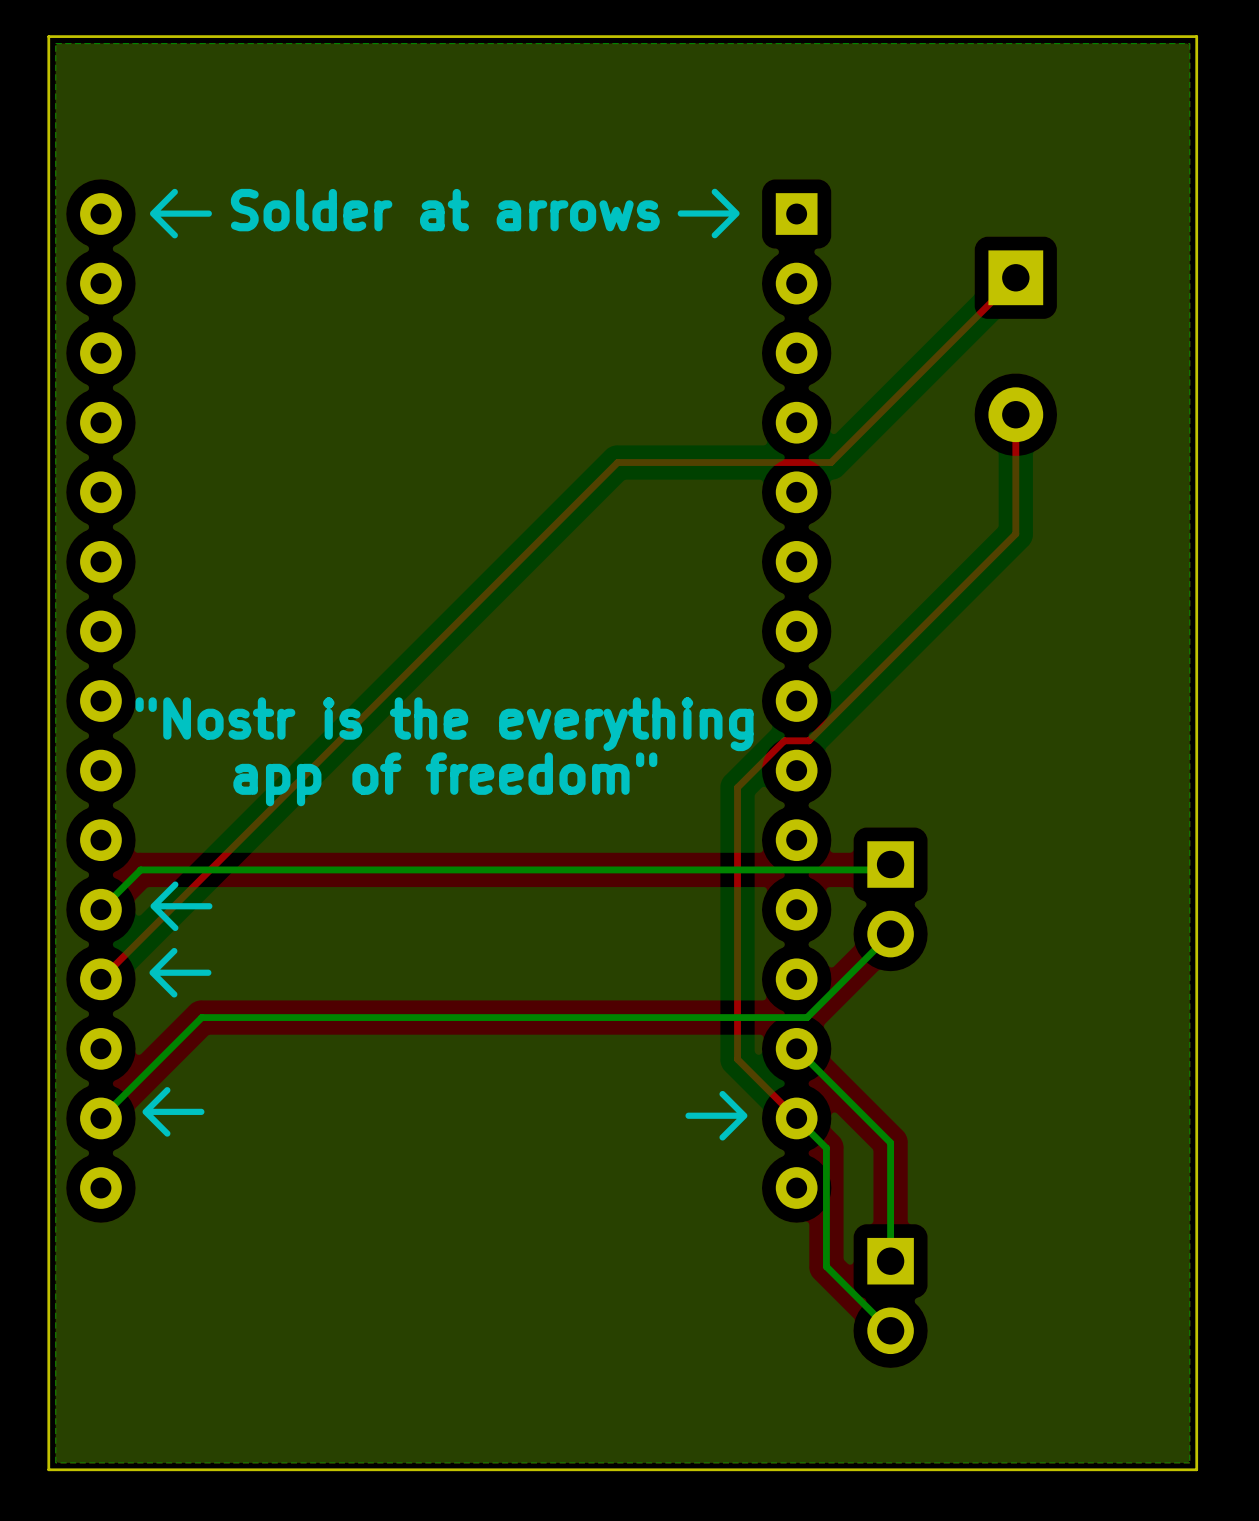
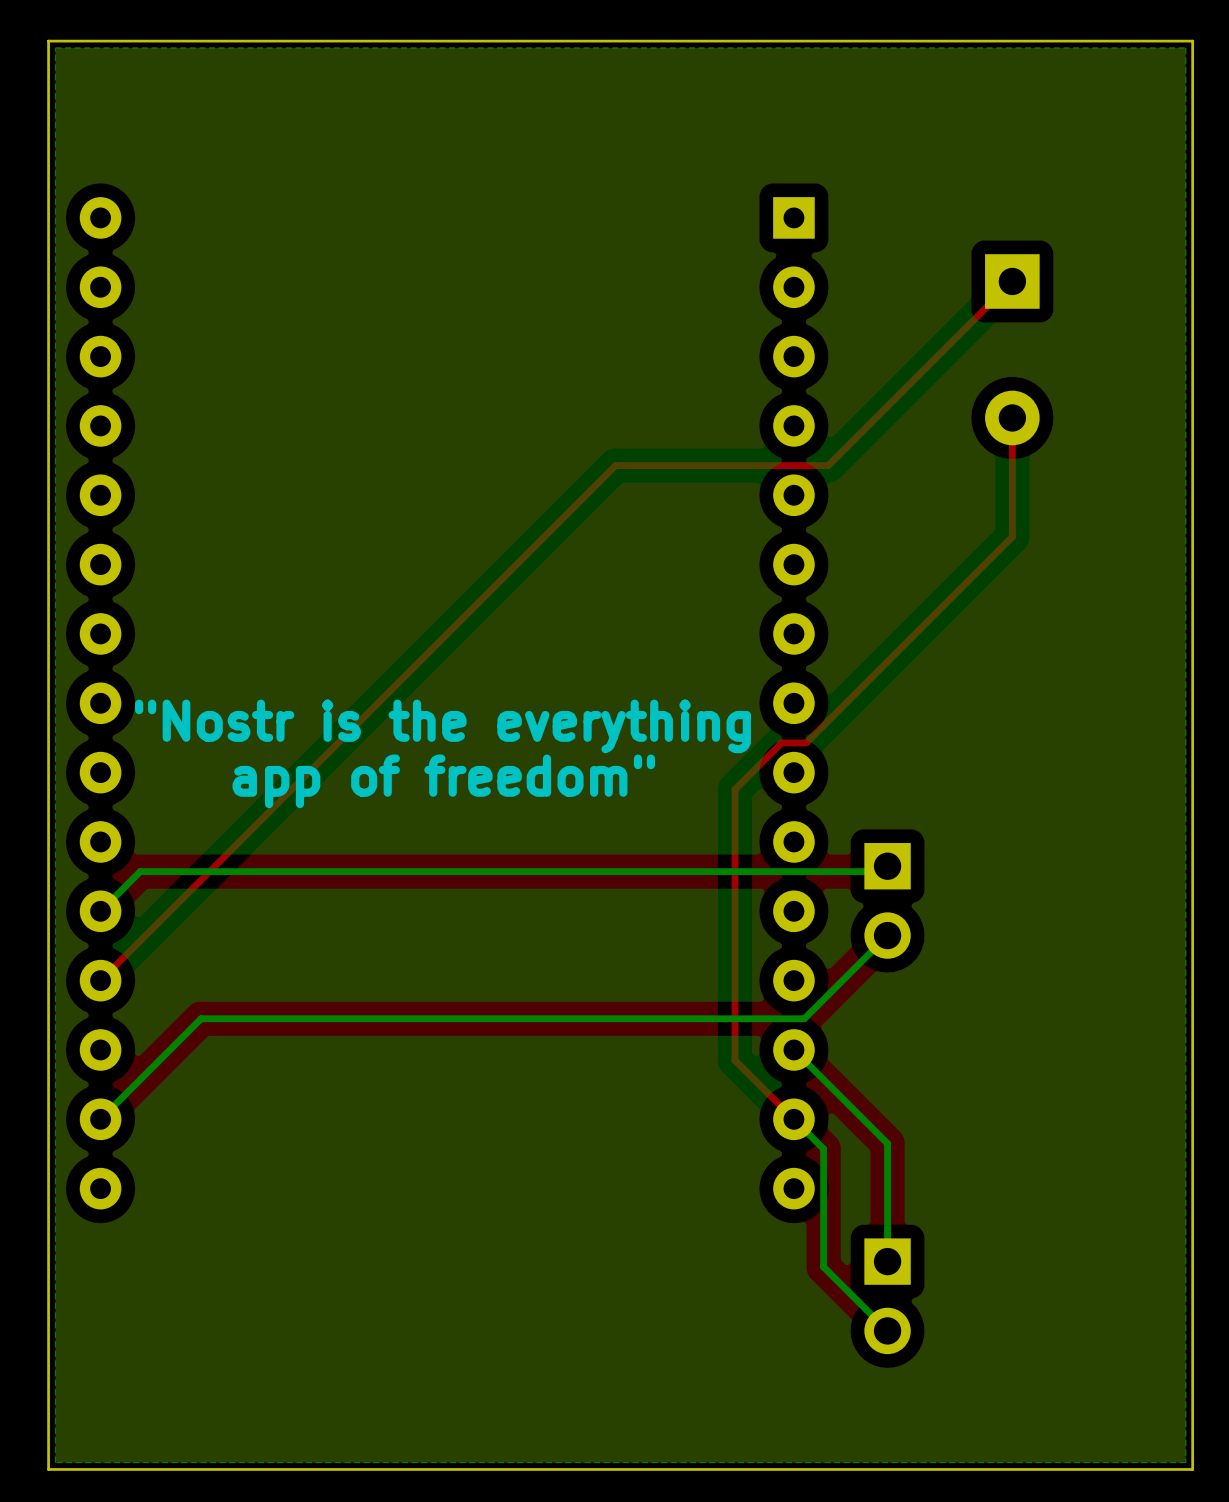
drawing: [150, 188, 212, 239] -> none
drawing: [677, 188, 740, 239] -> none
text: Solder at arrows (445, 210) -> none
drawing: [149, 881, 213, 998] -> none
drawing: [142, 1087, 205, 1137] -> none
drawing: [685, 1091, 748, 1141] -> none

